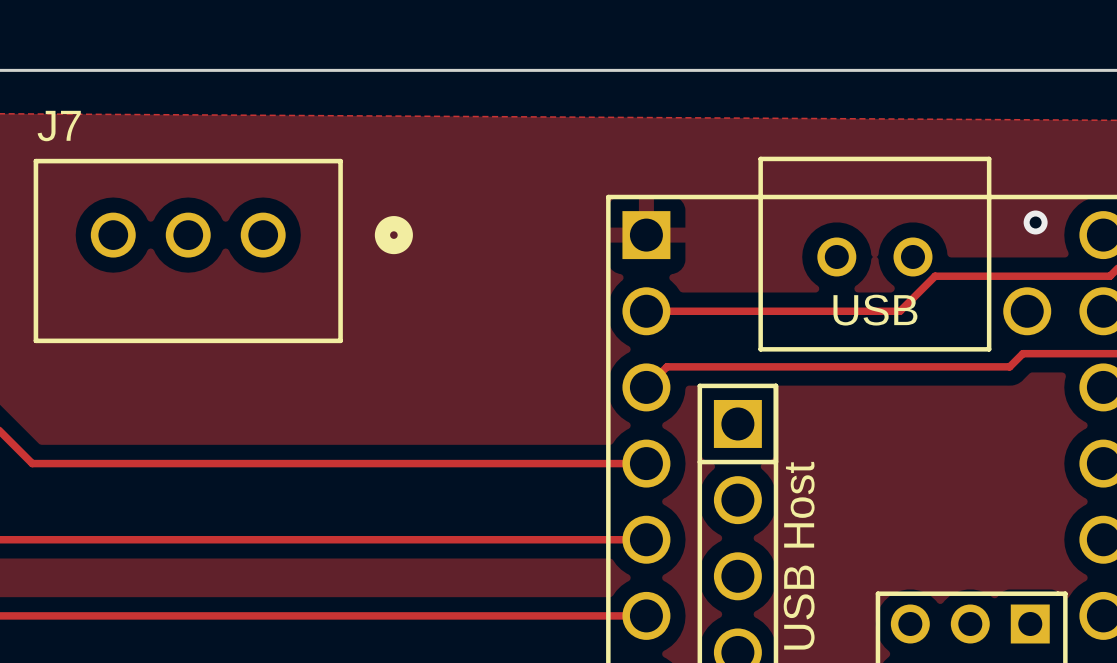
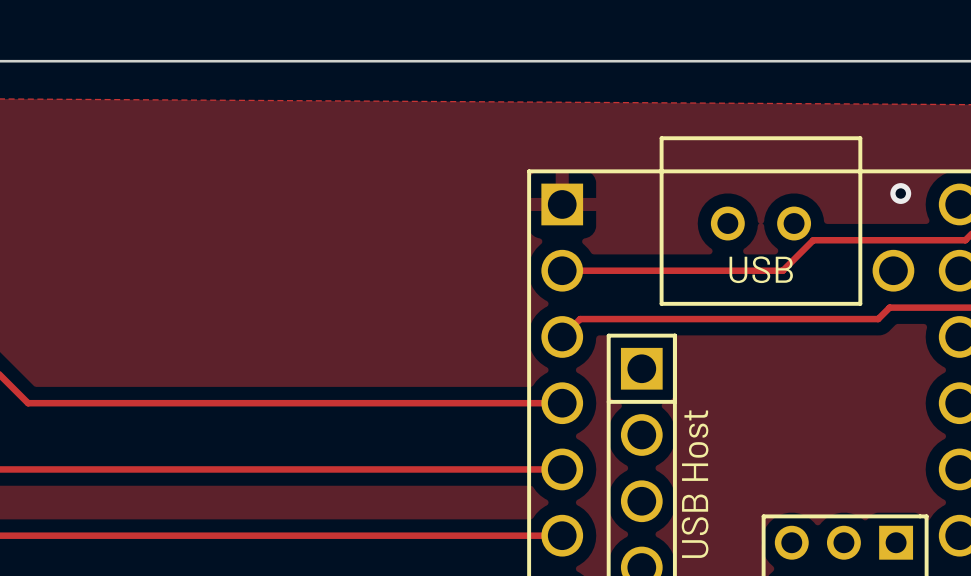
J7: (223, 250) -> none

